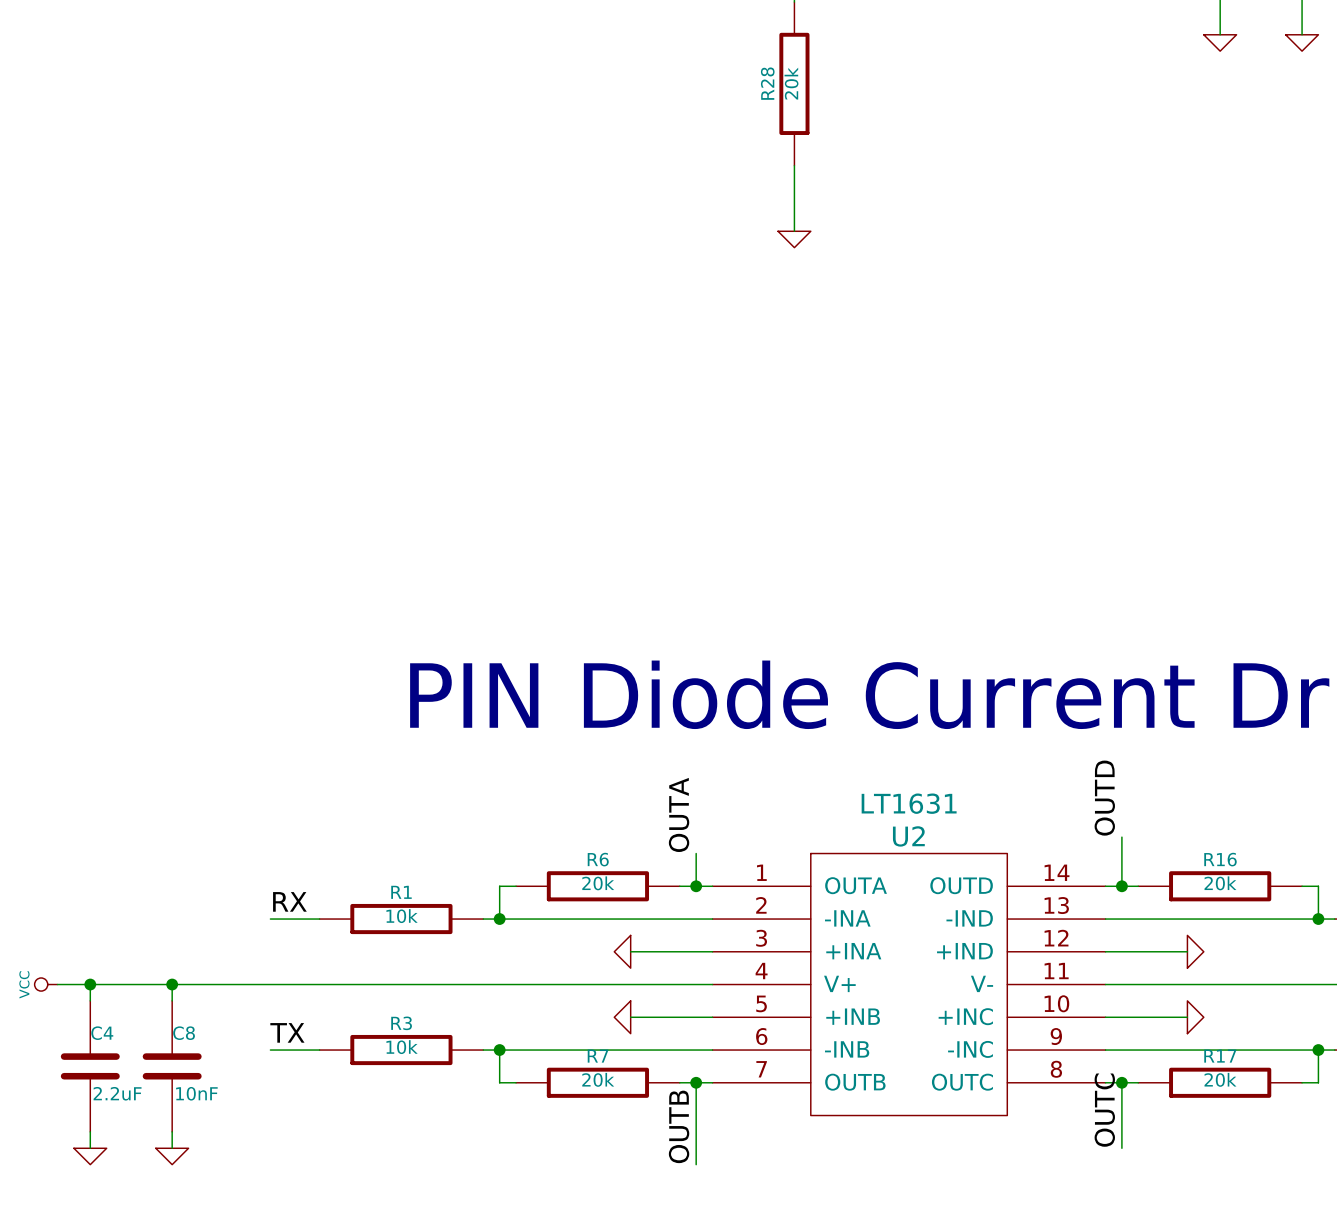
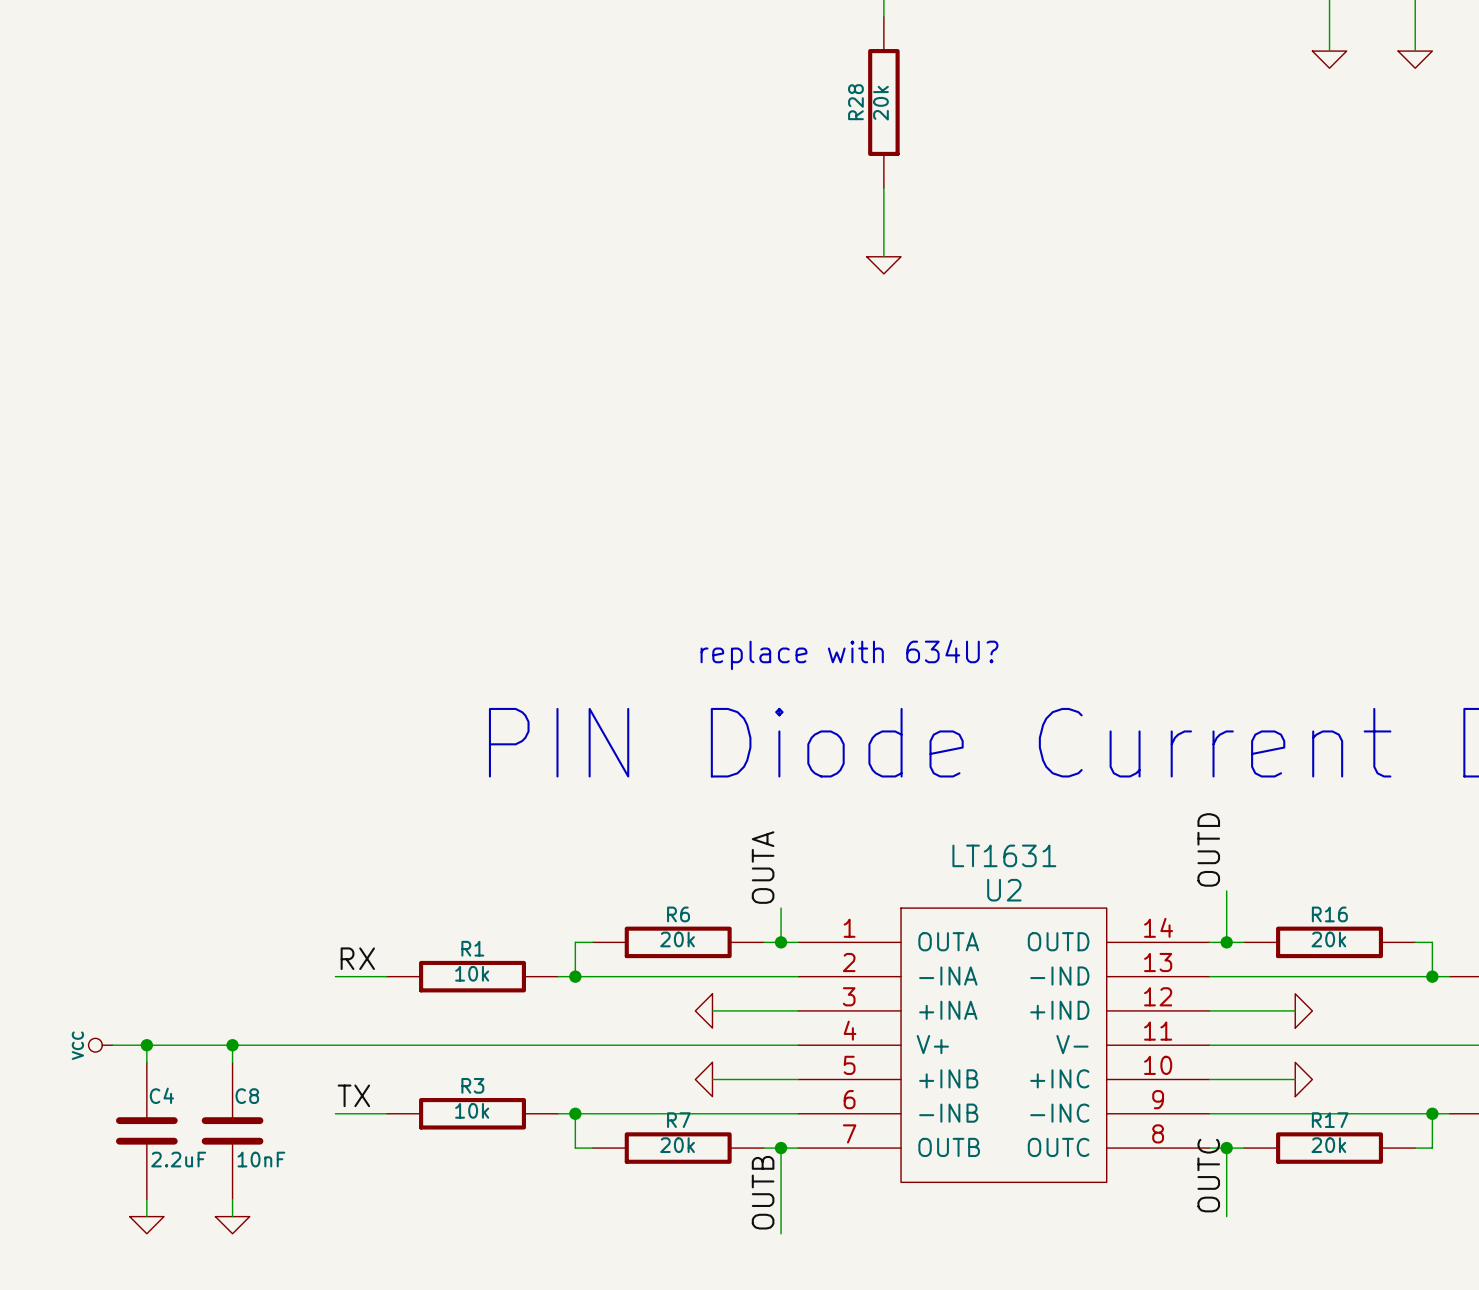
text: none -> replace with 634U? (849, 654)

